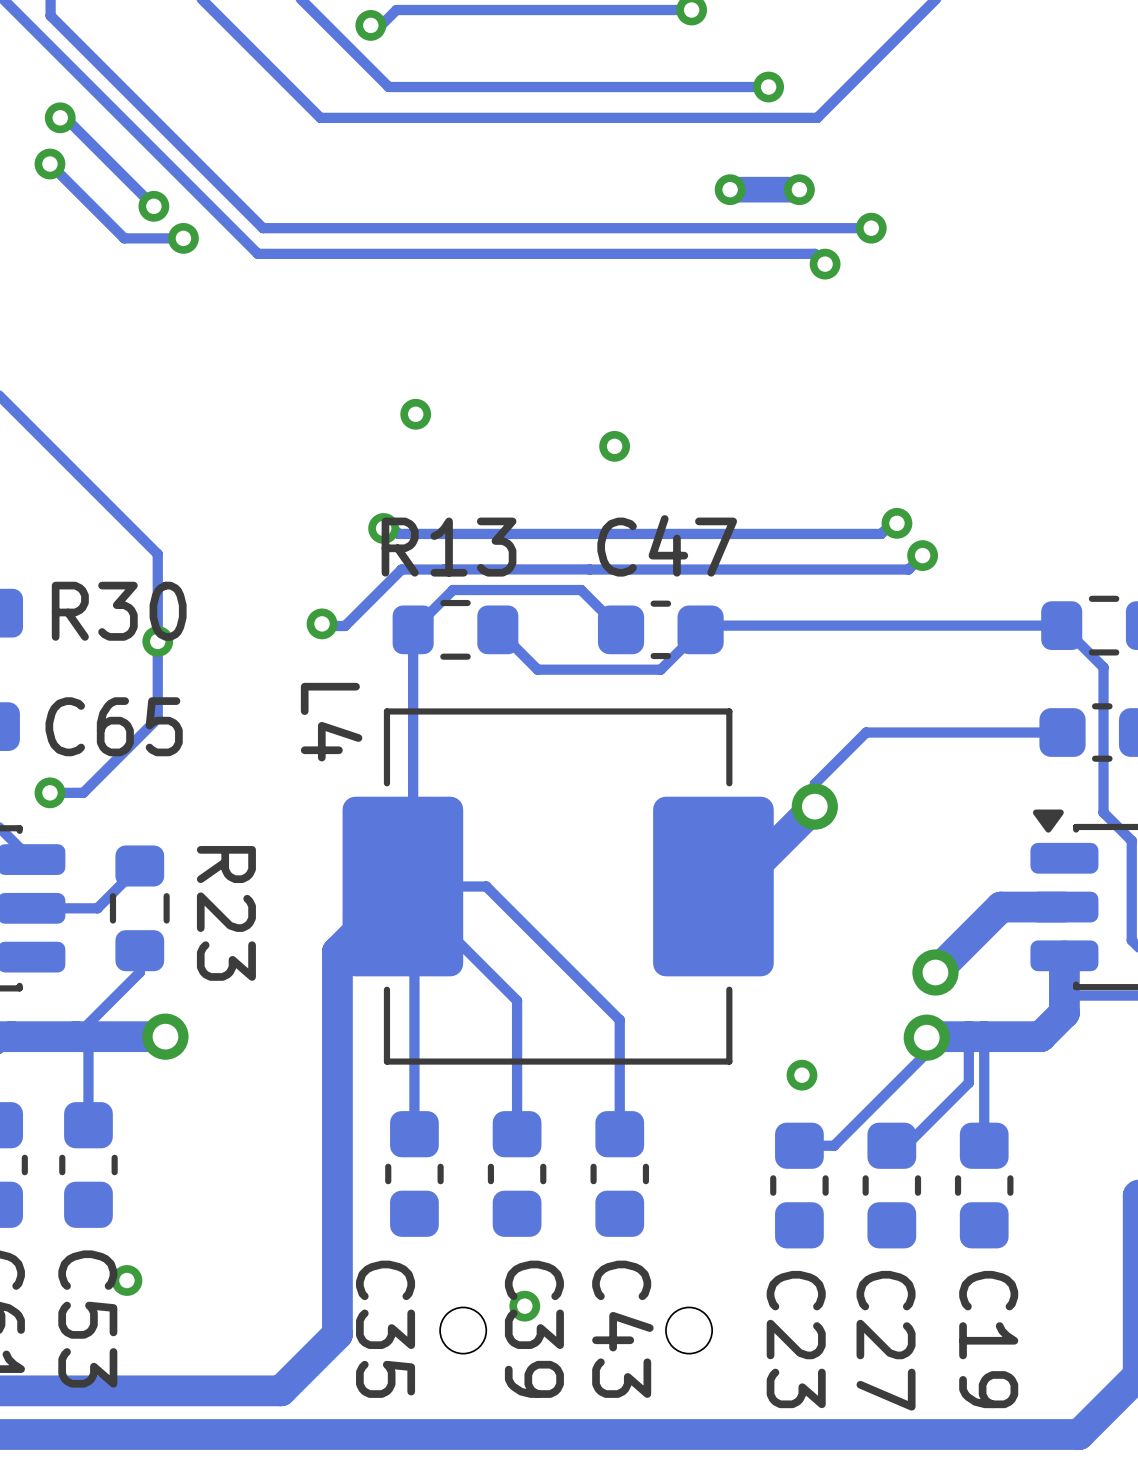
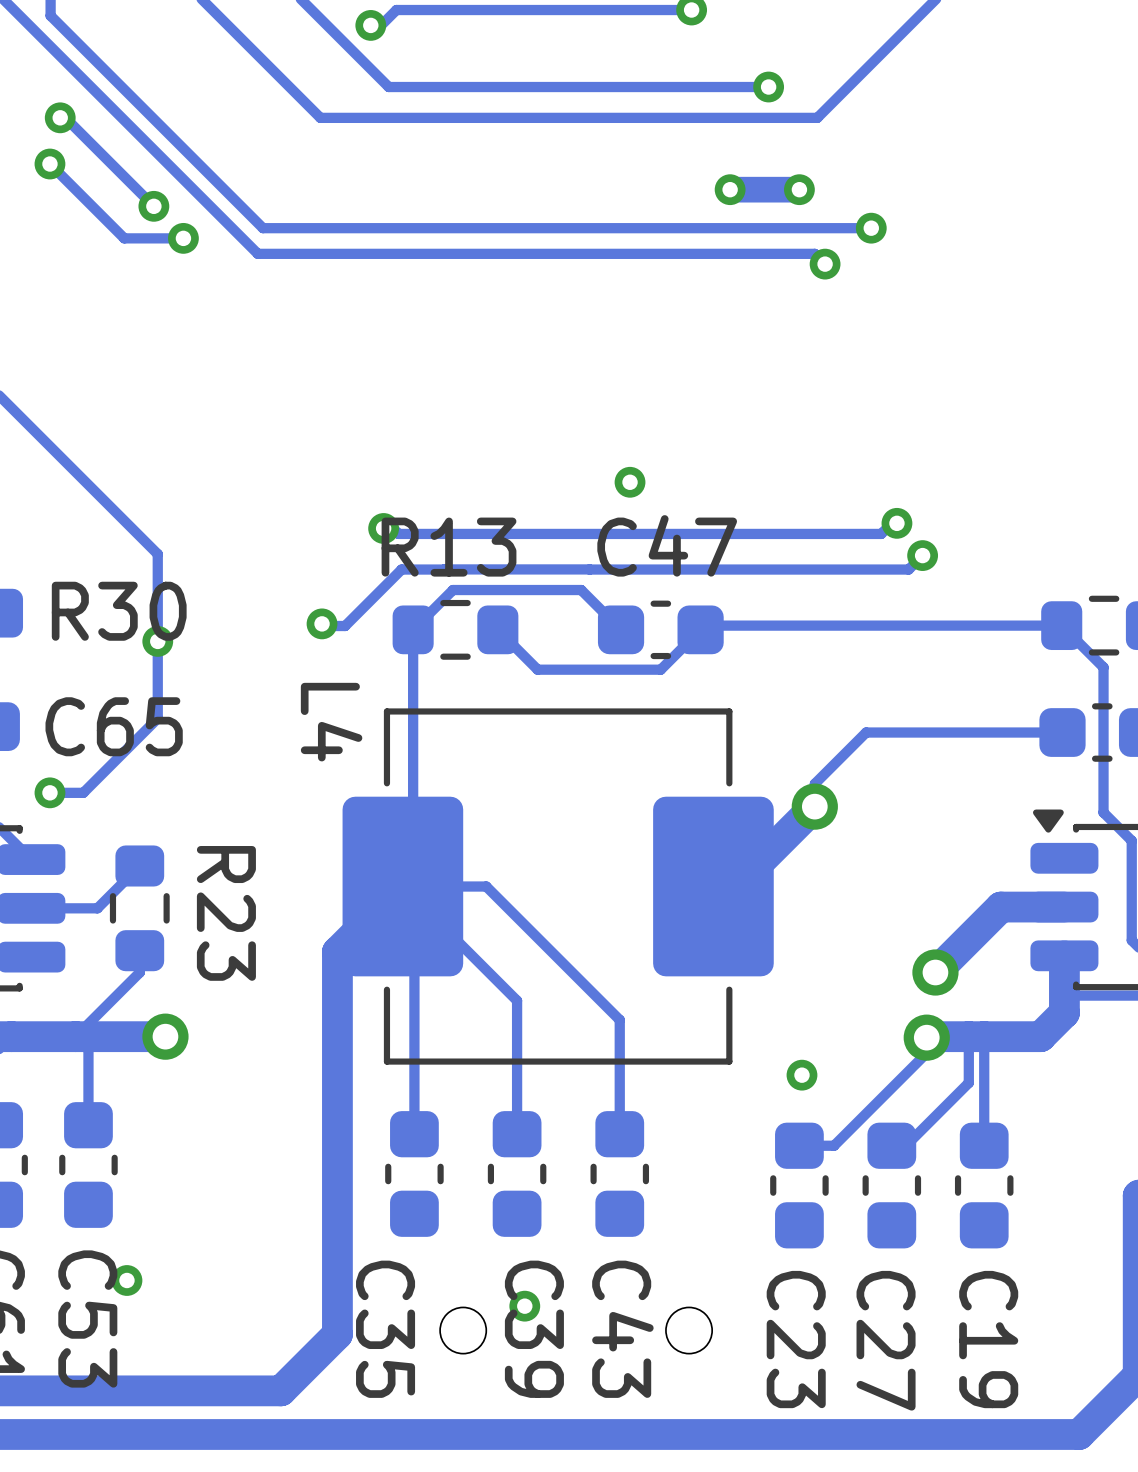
via: (415, 414) -> none
via position: (614, 446) -> (630, 482)

